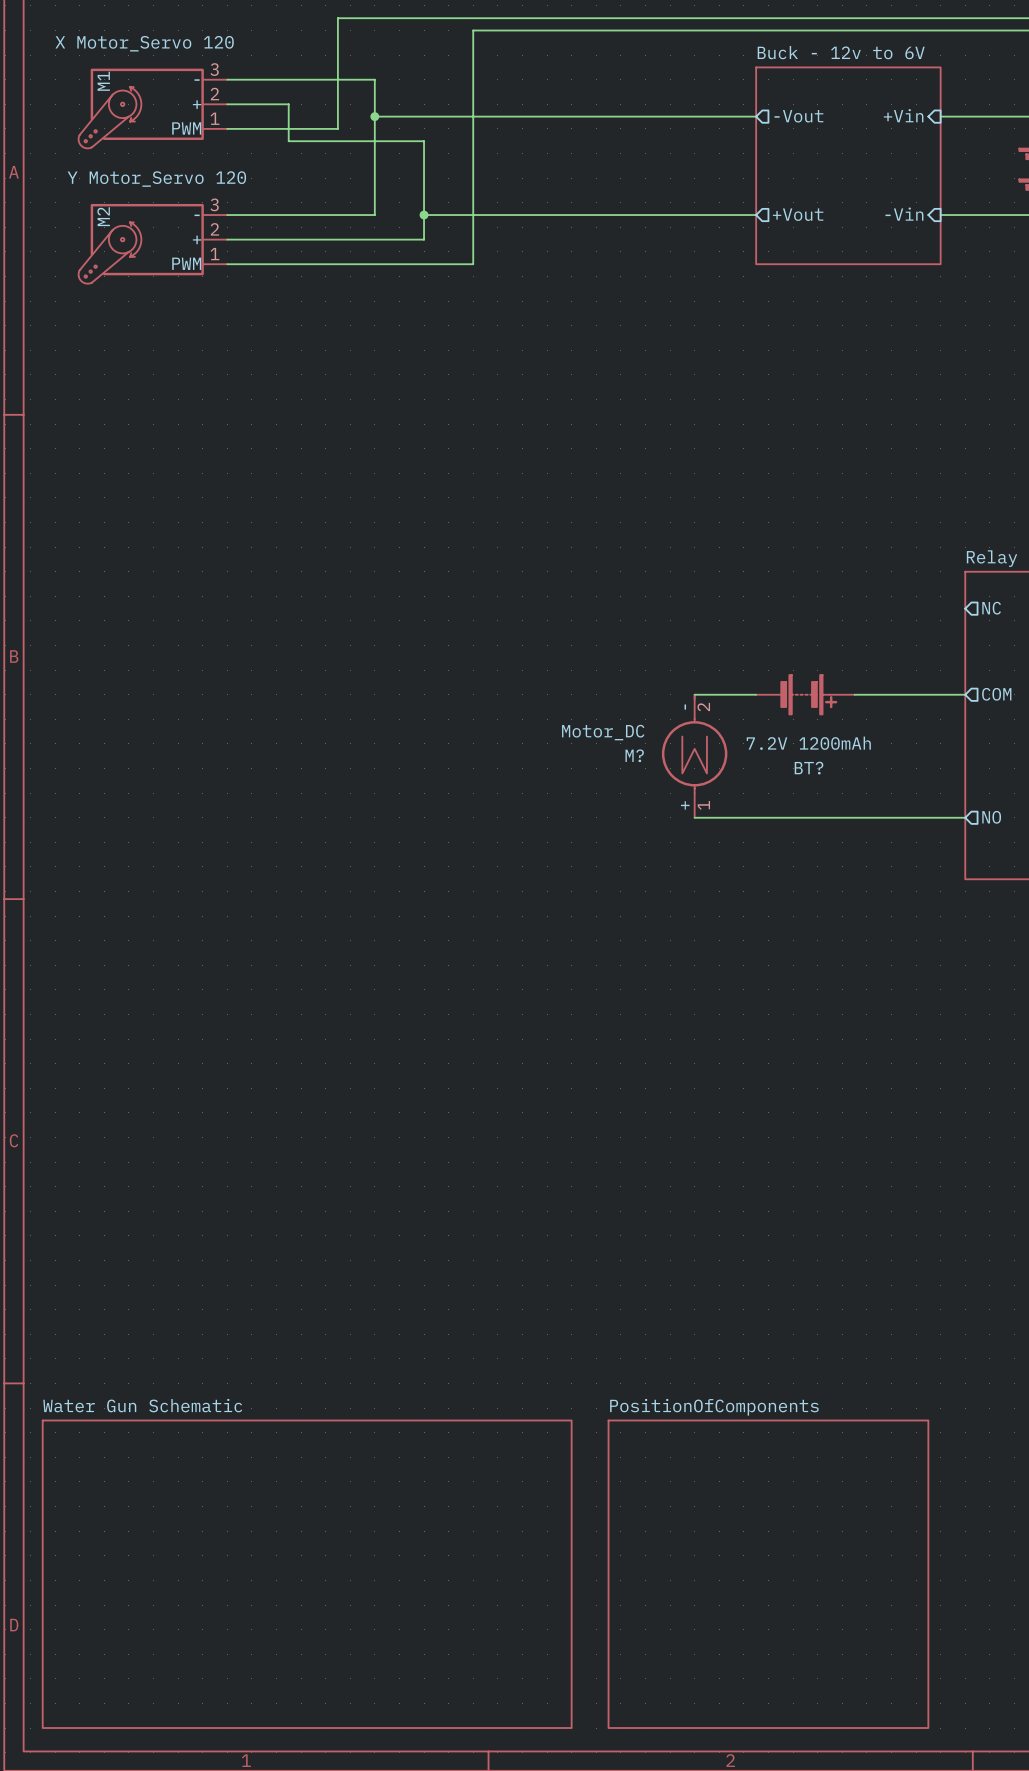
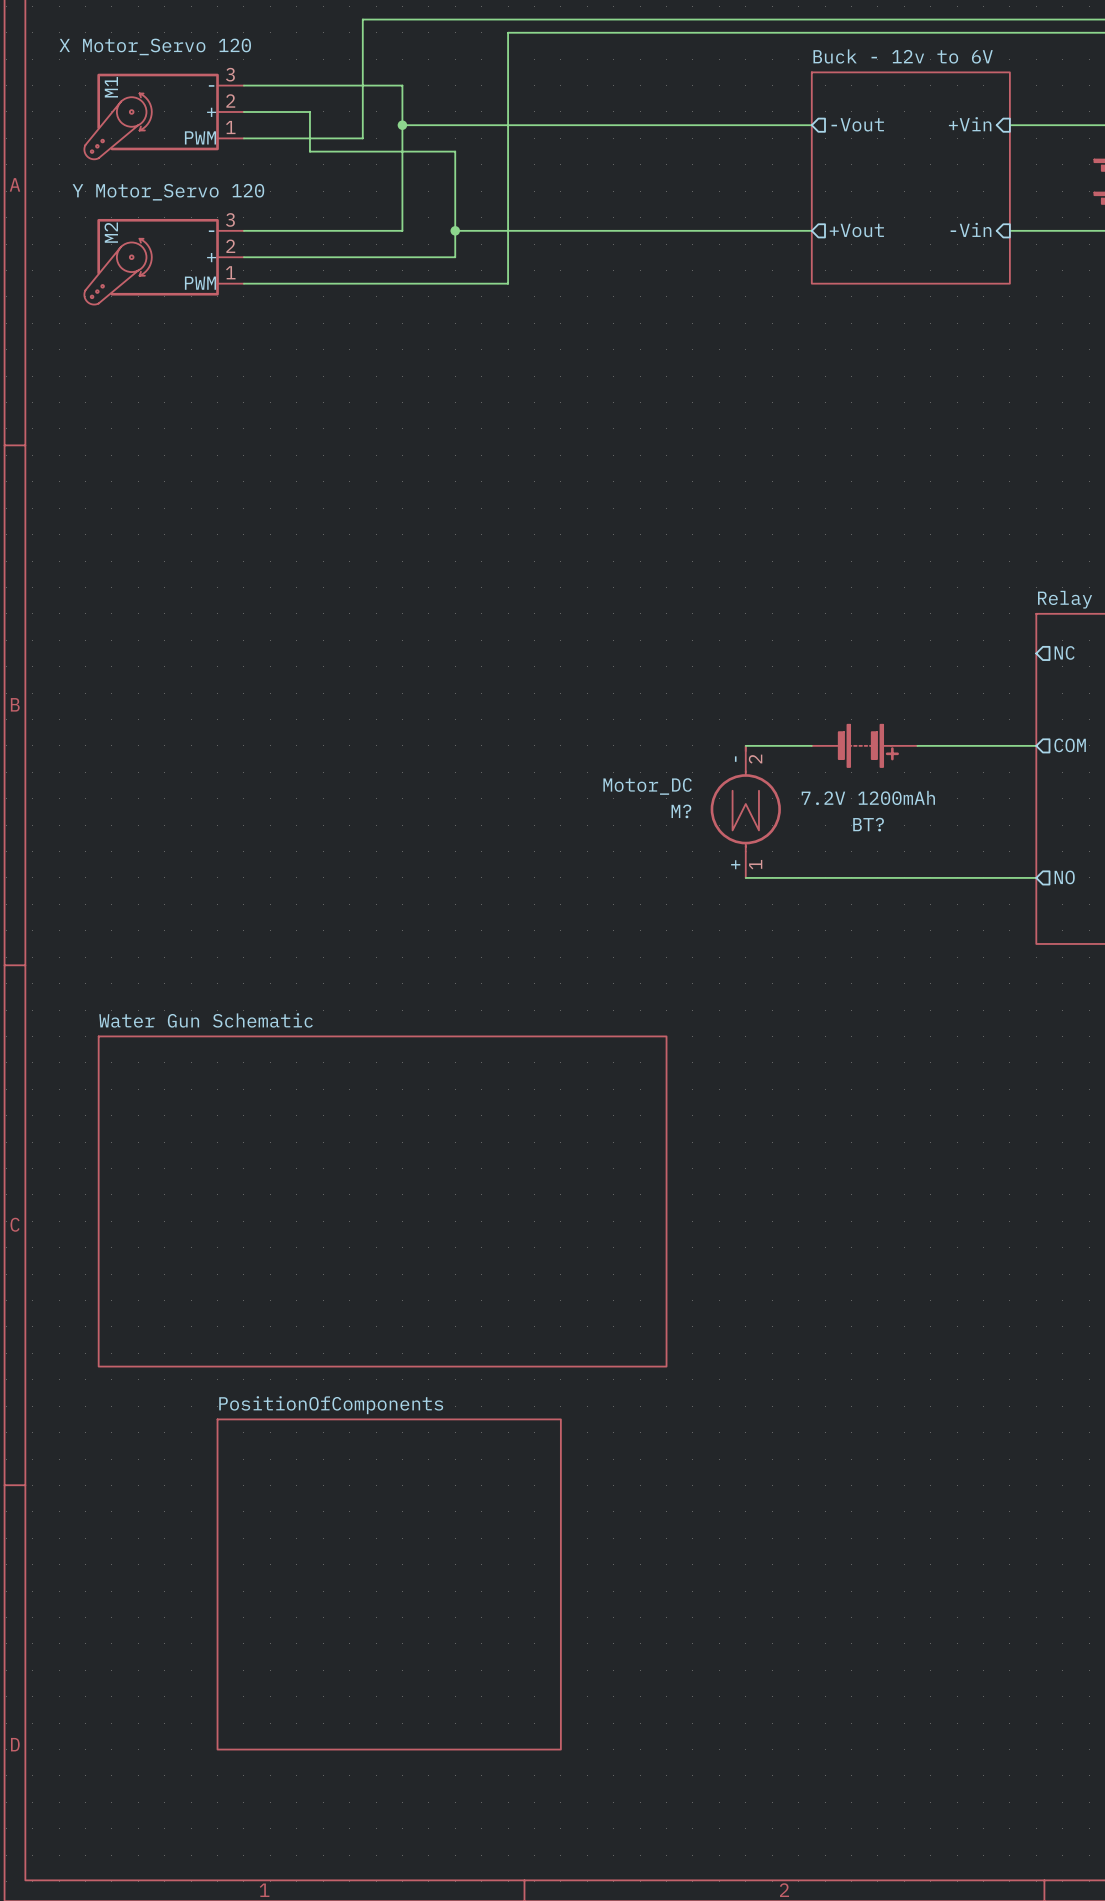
sheet Water Gun Schematic: none -> (382, 1201)
sheet PositionOfComponents: none -> (389, 1584)
sheet Water Gun Schematic: (307, 1574) -> none
sheet PositionOfComponents: (768, 1574) -> none

